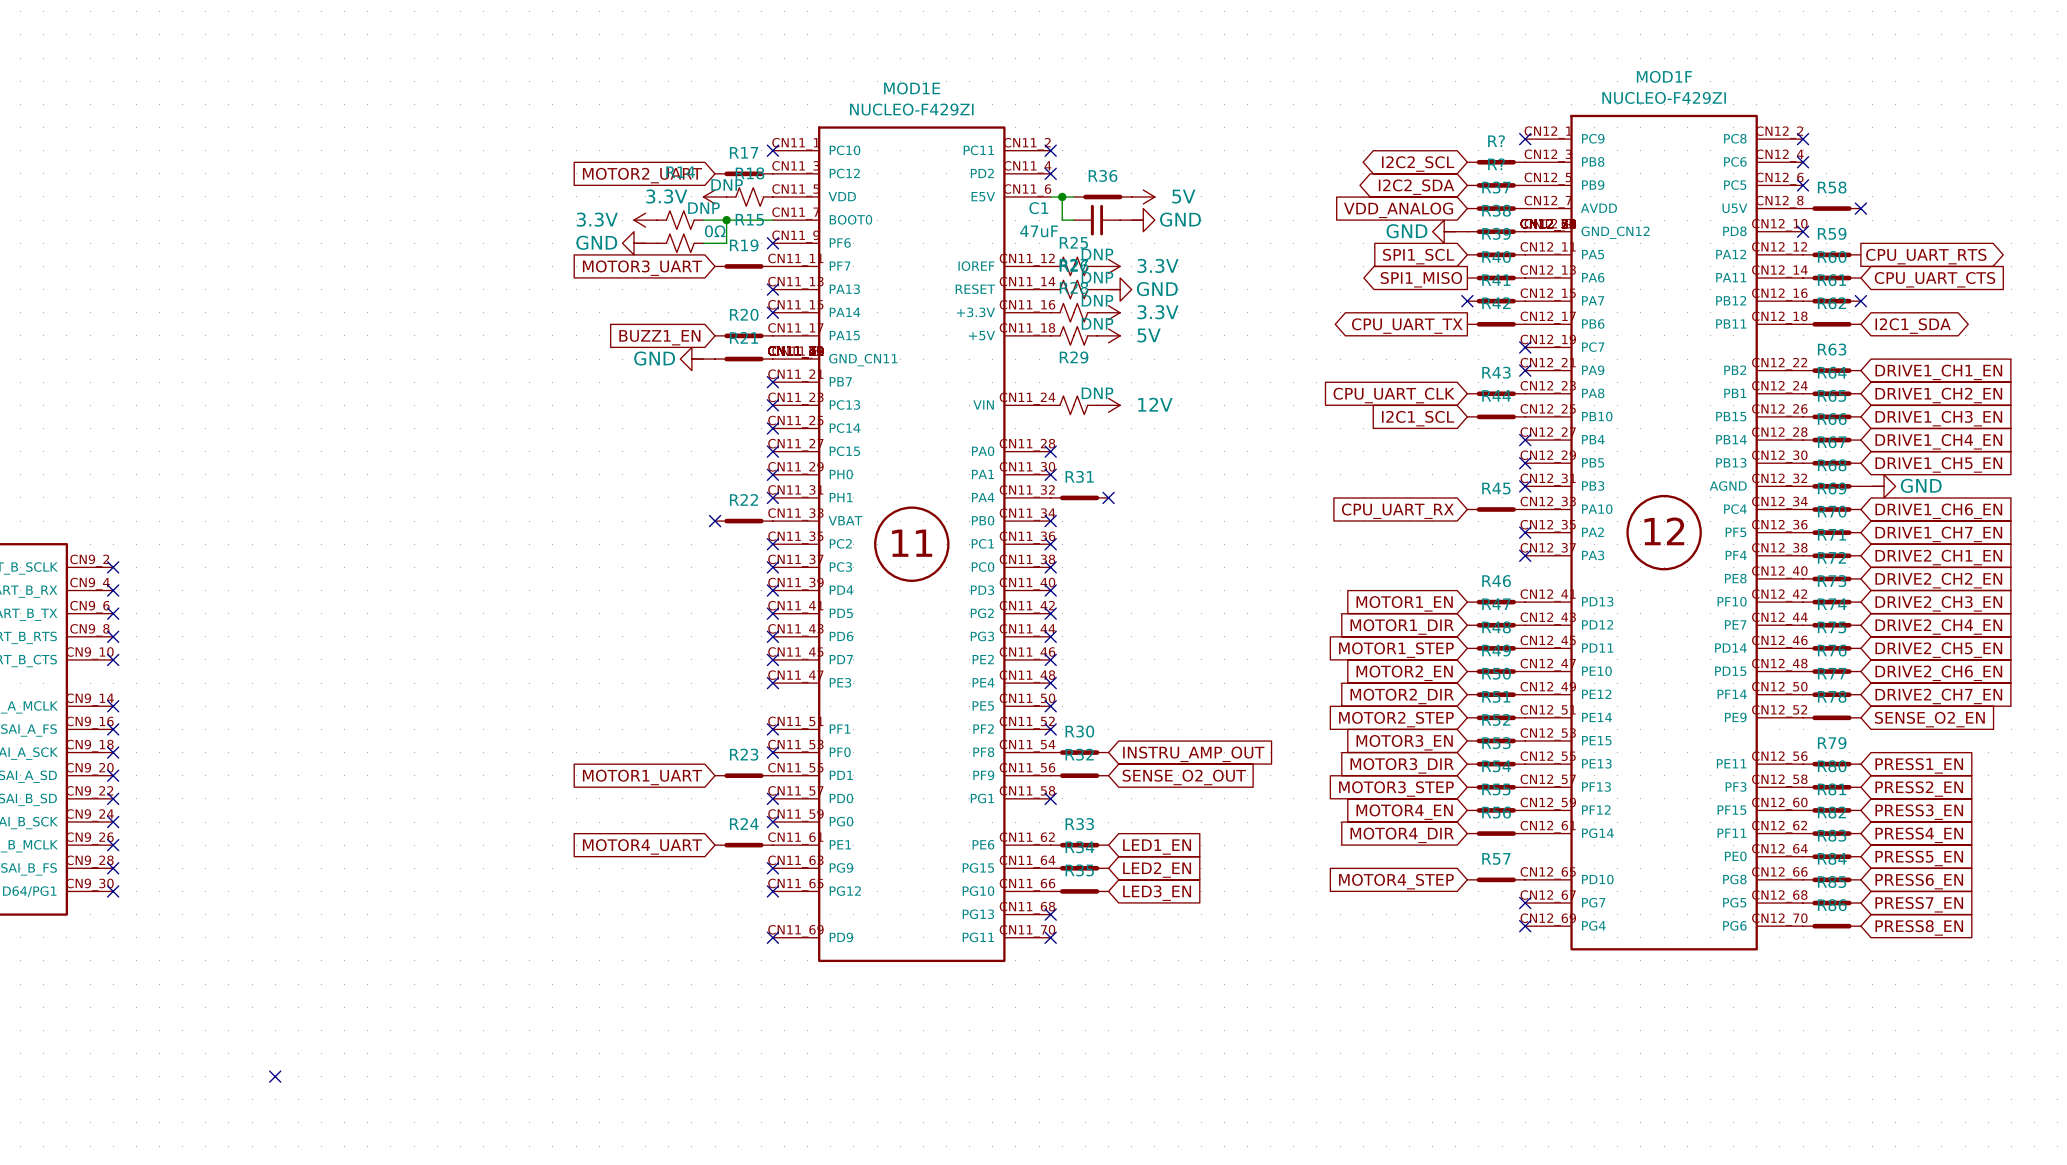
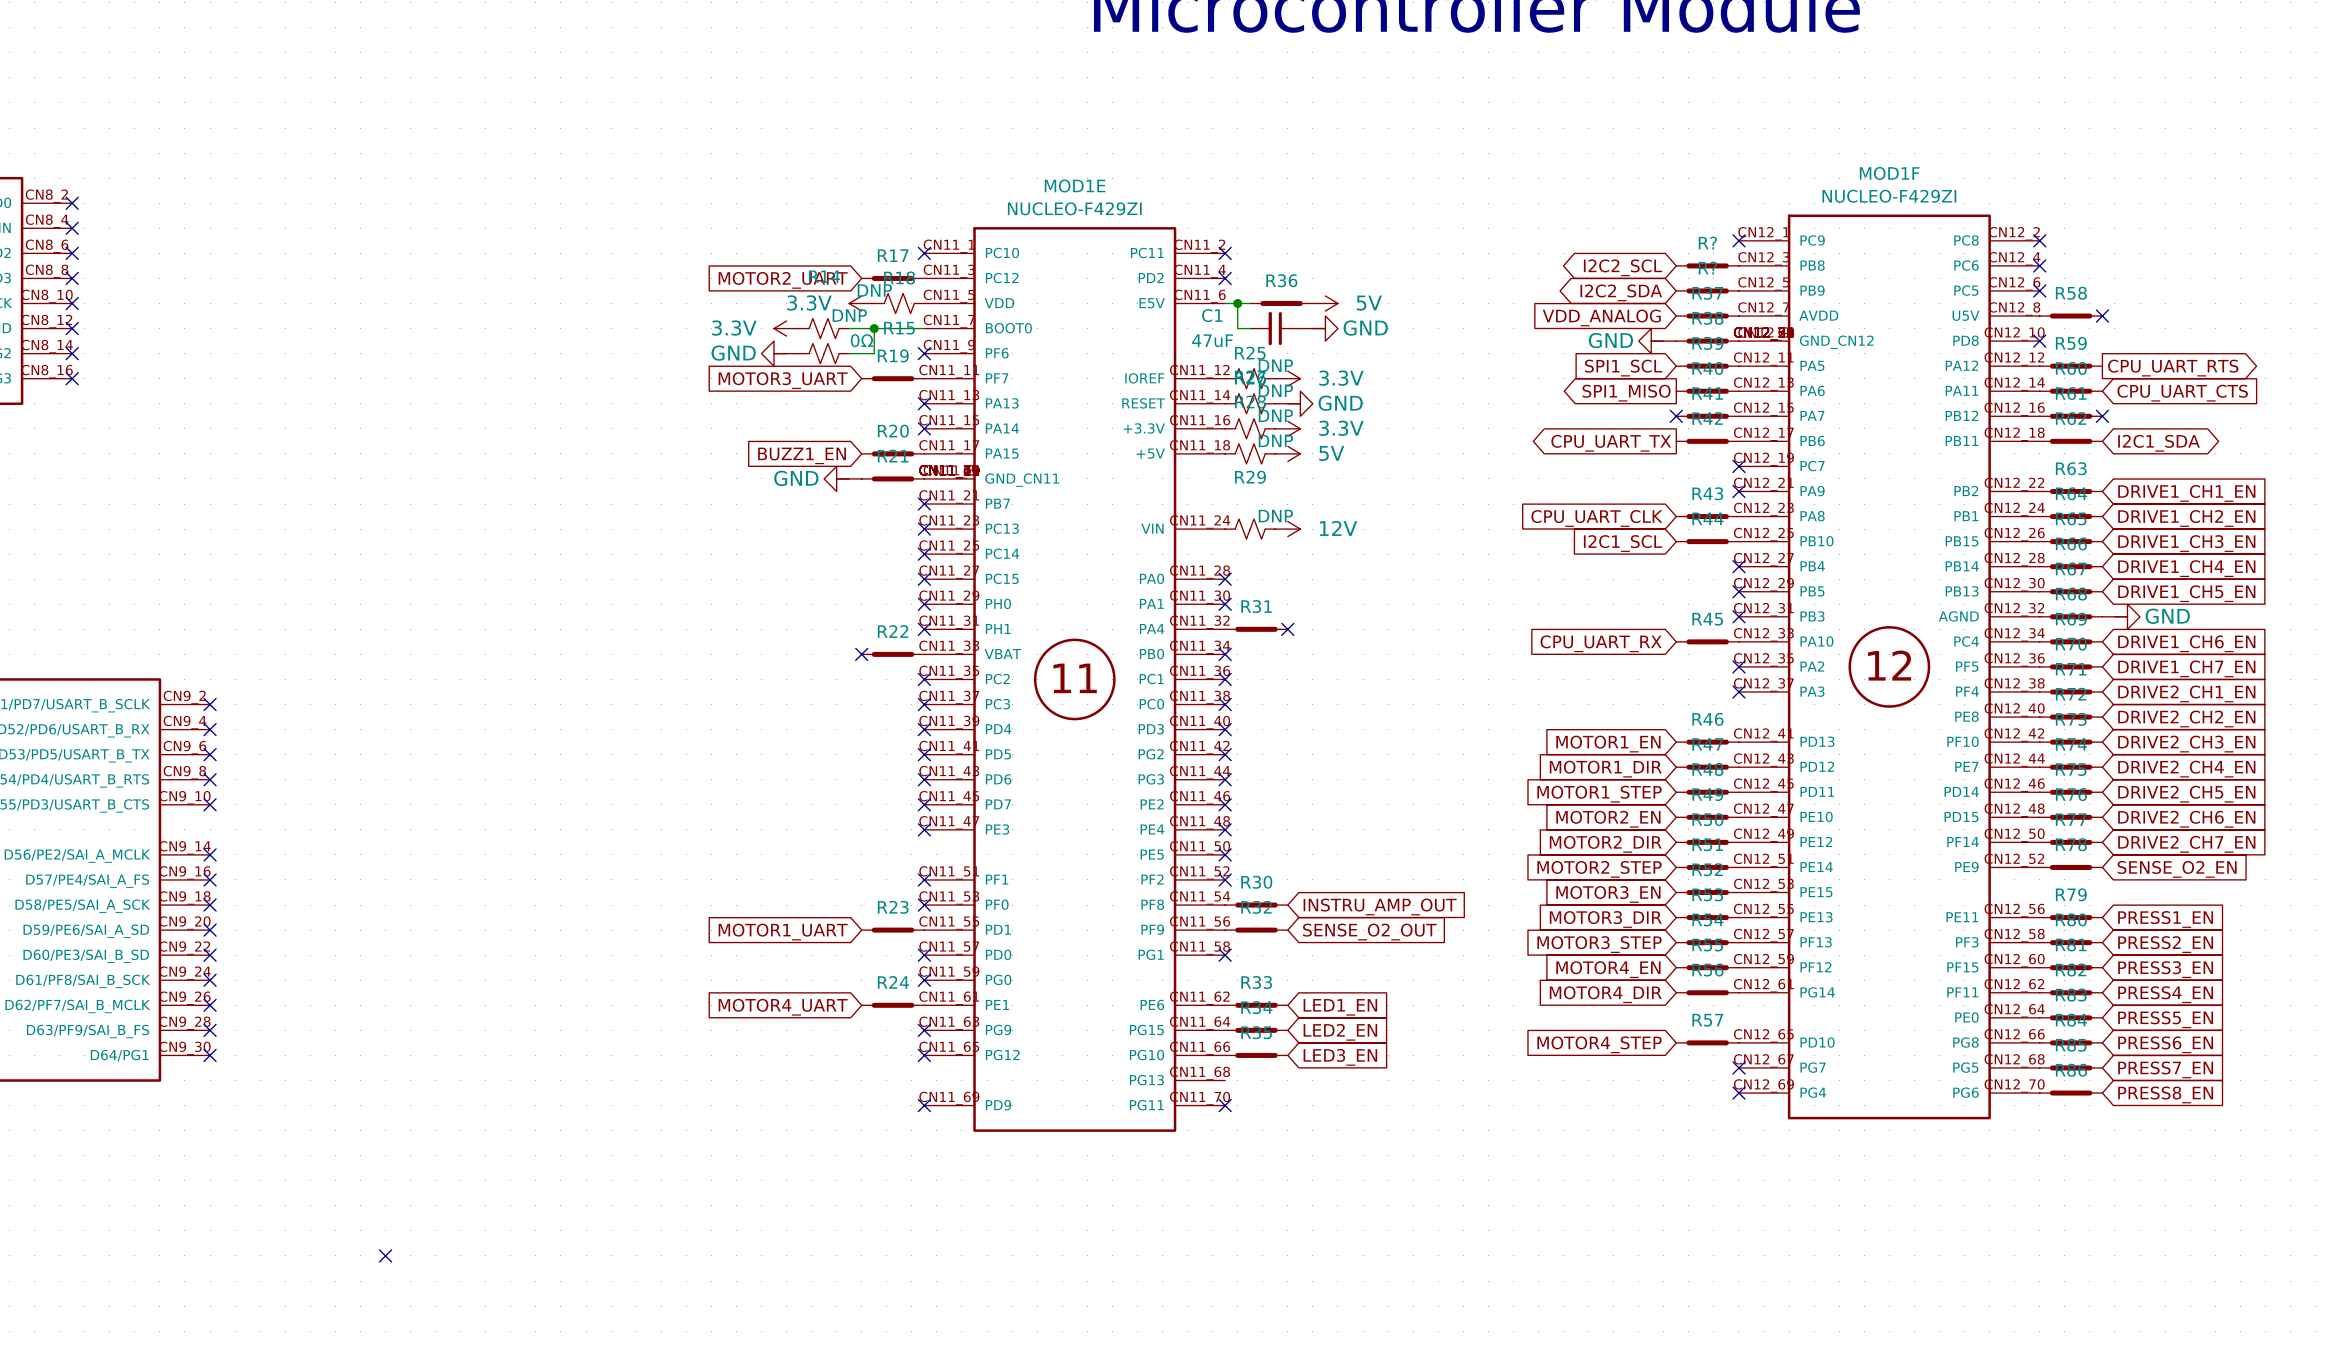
no-connect mark: (1050, 914) -> none

